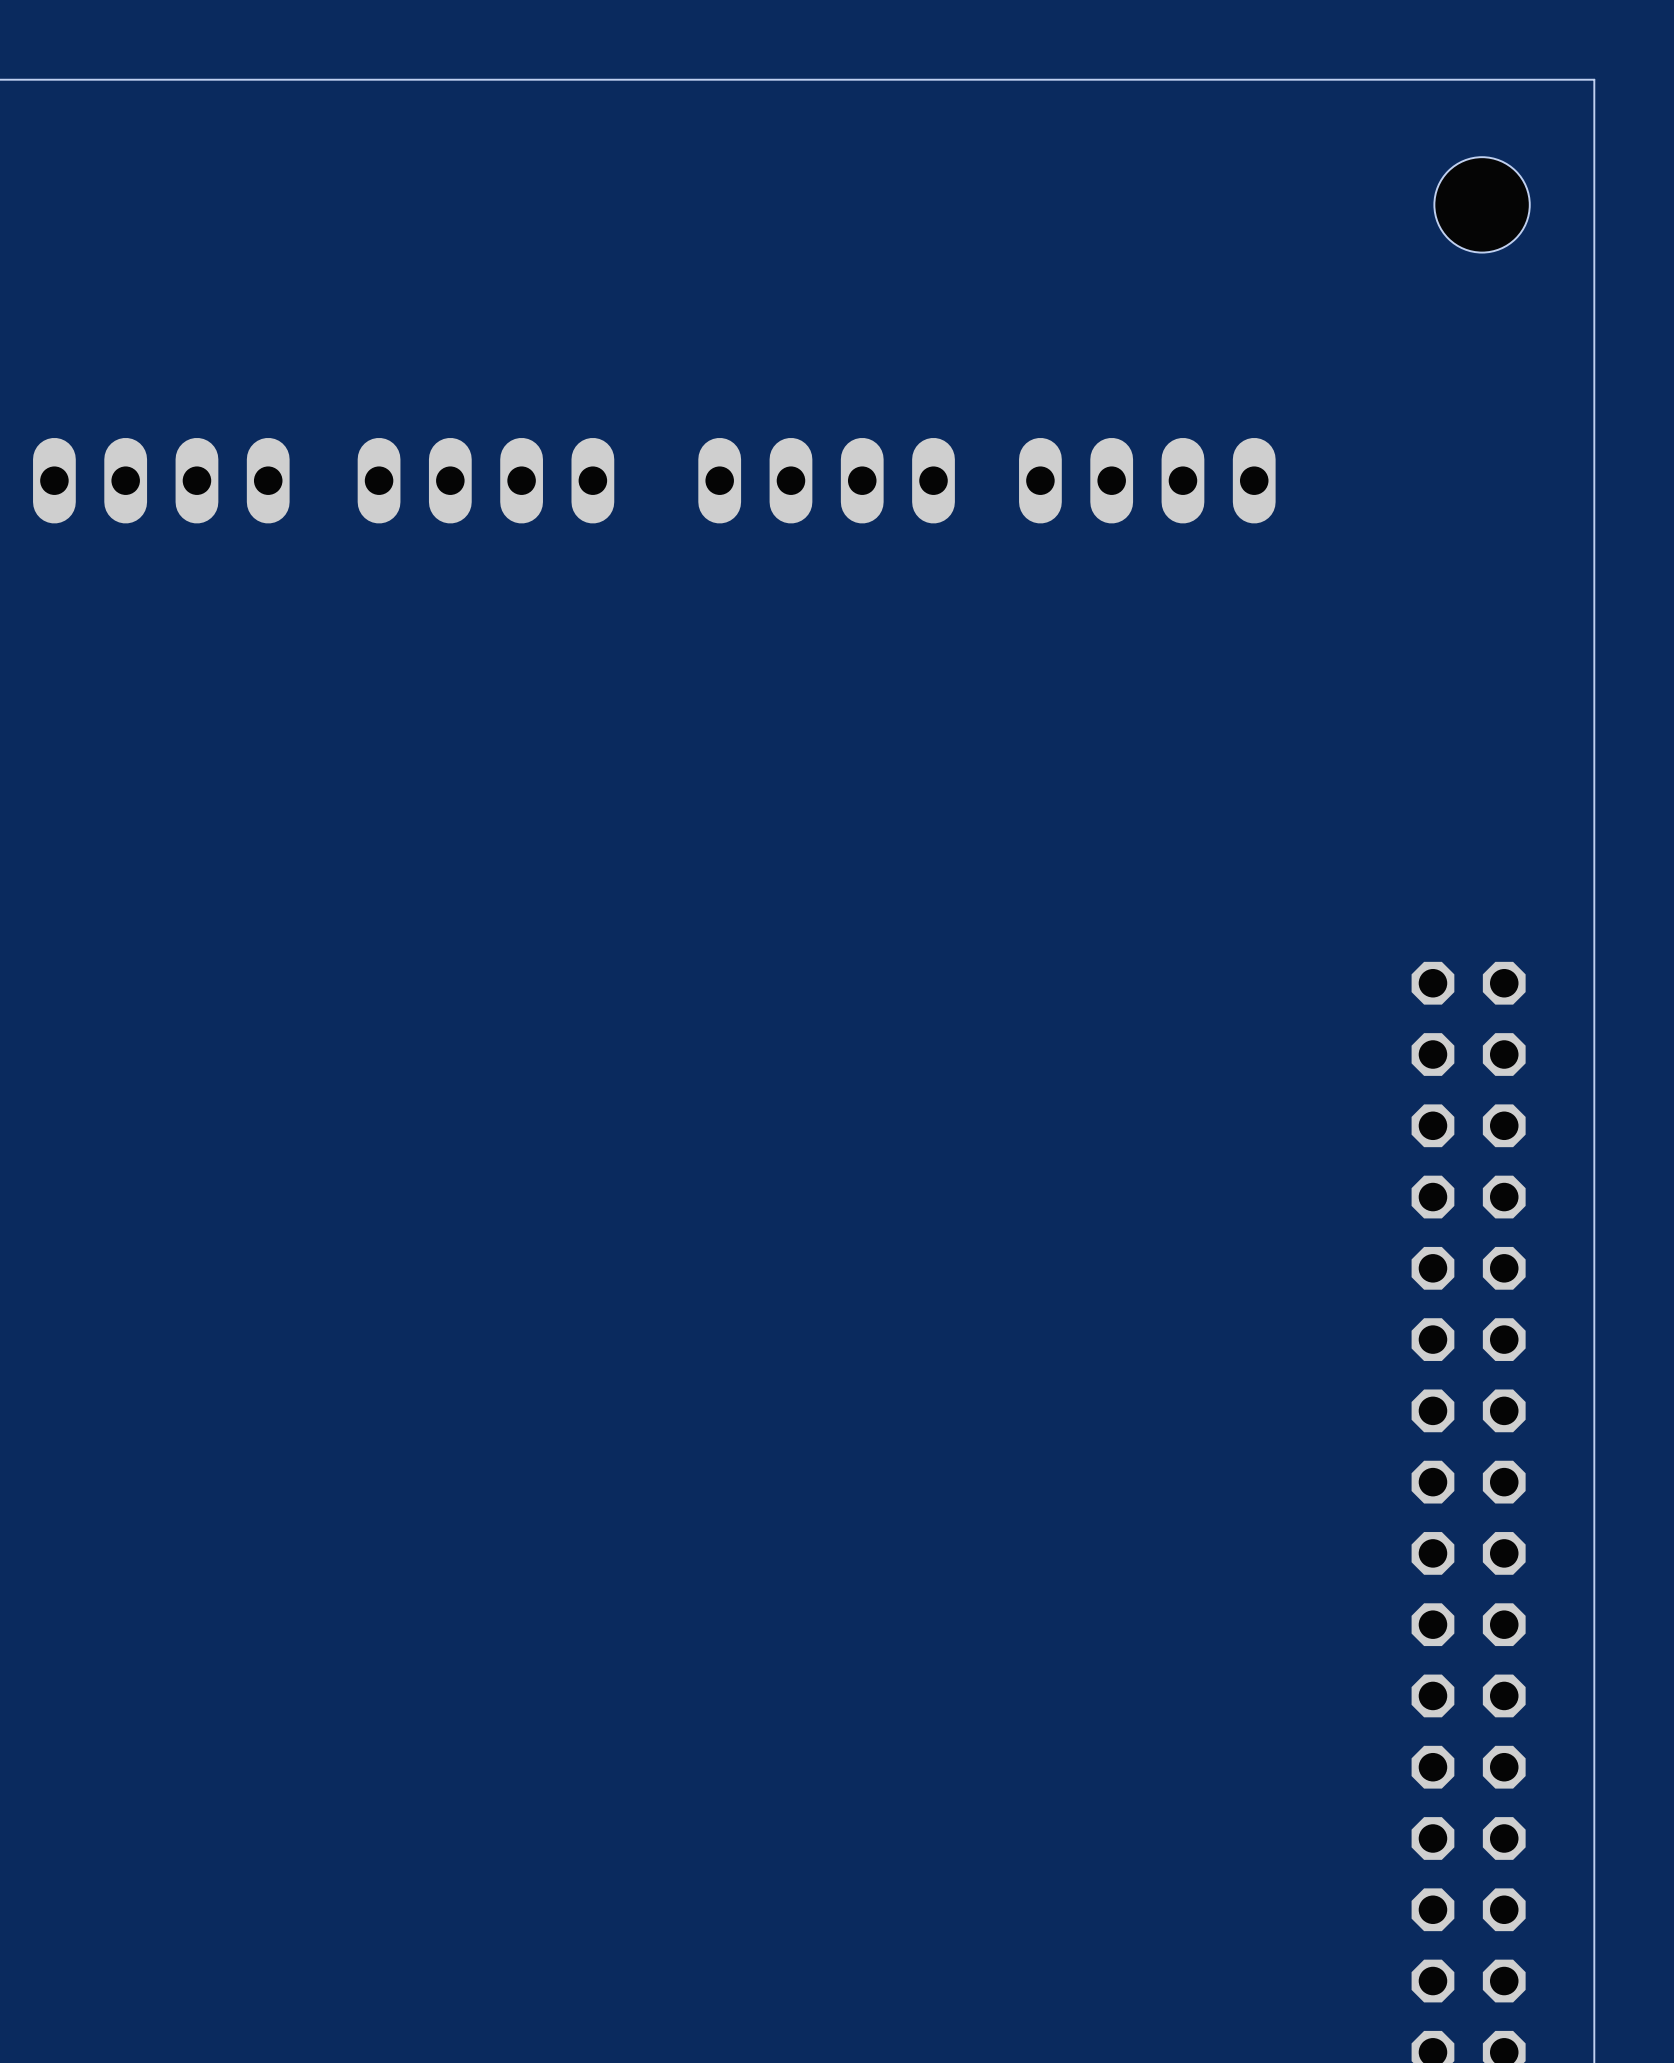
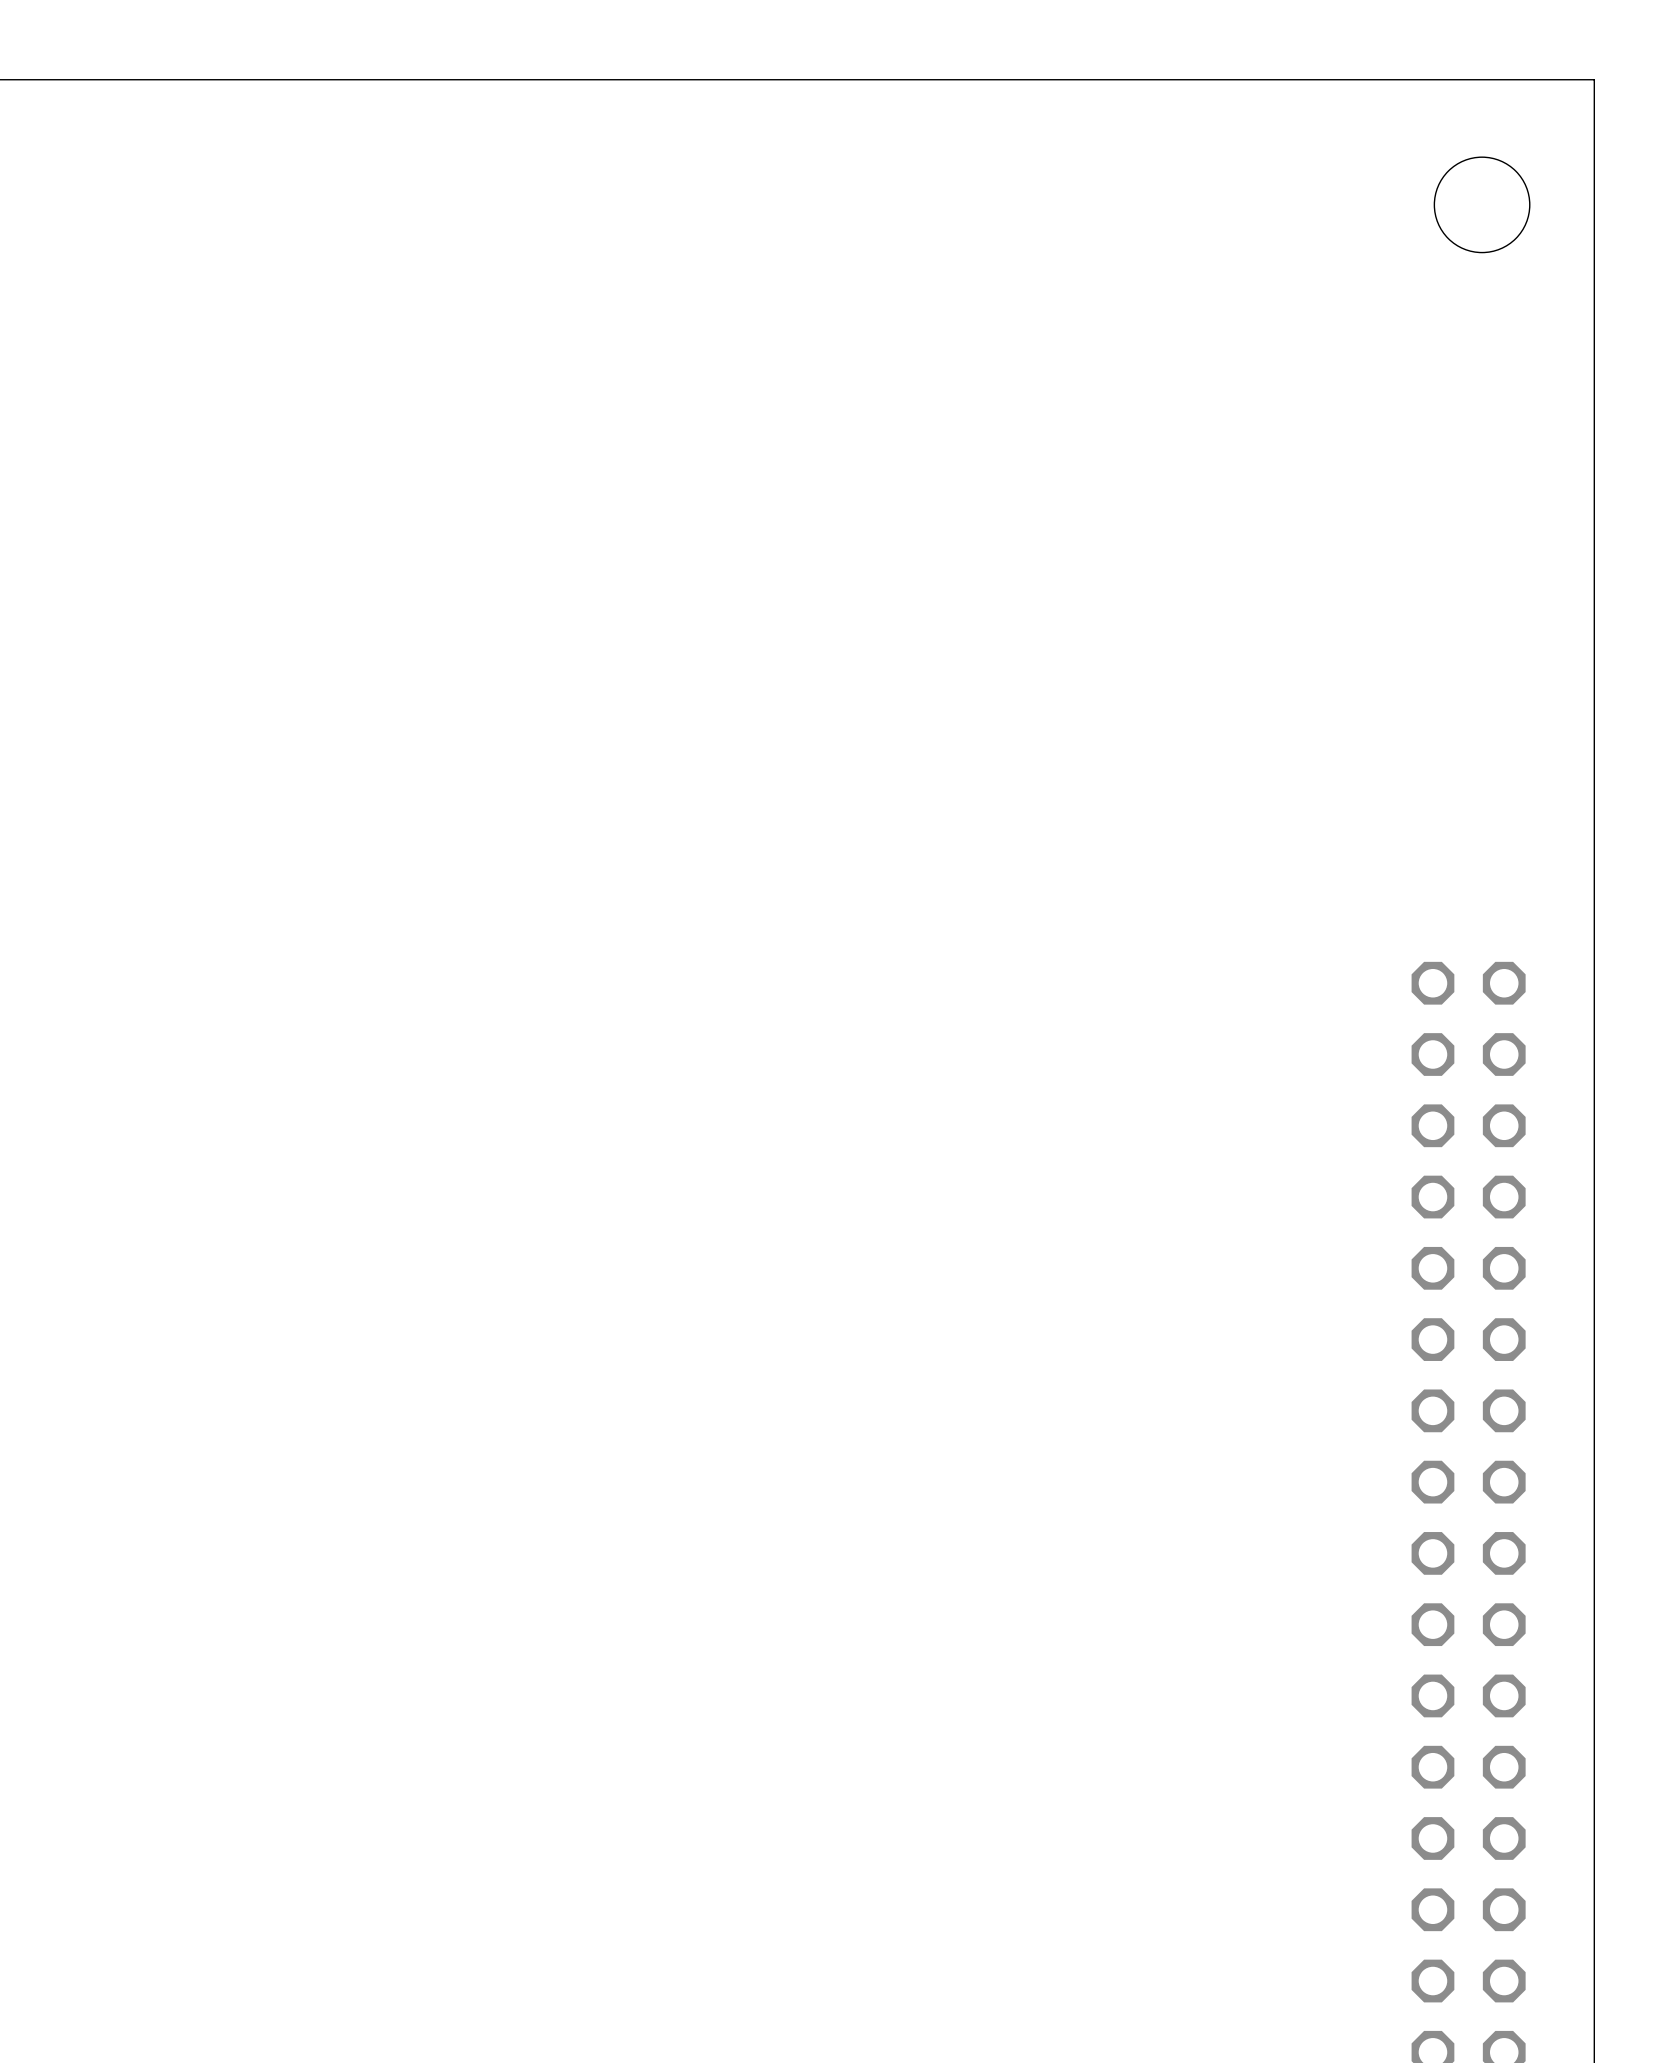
part: (161, 480) -> none
part: (485, 480) -> none
part: (826, 480) -> none
part: (1147, 480) -> none

